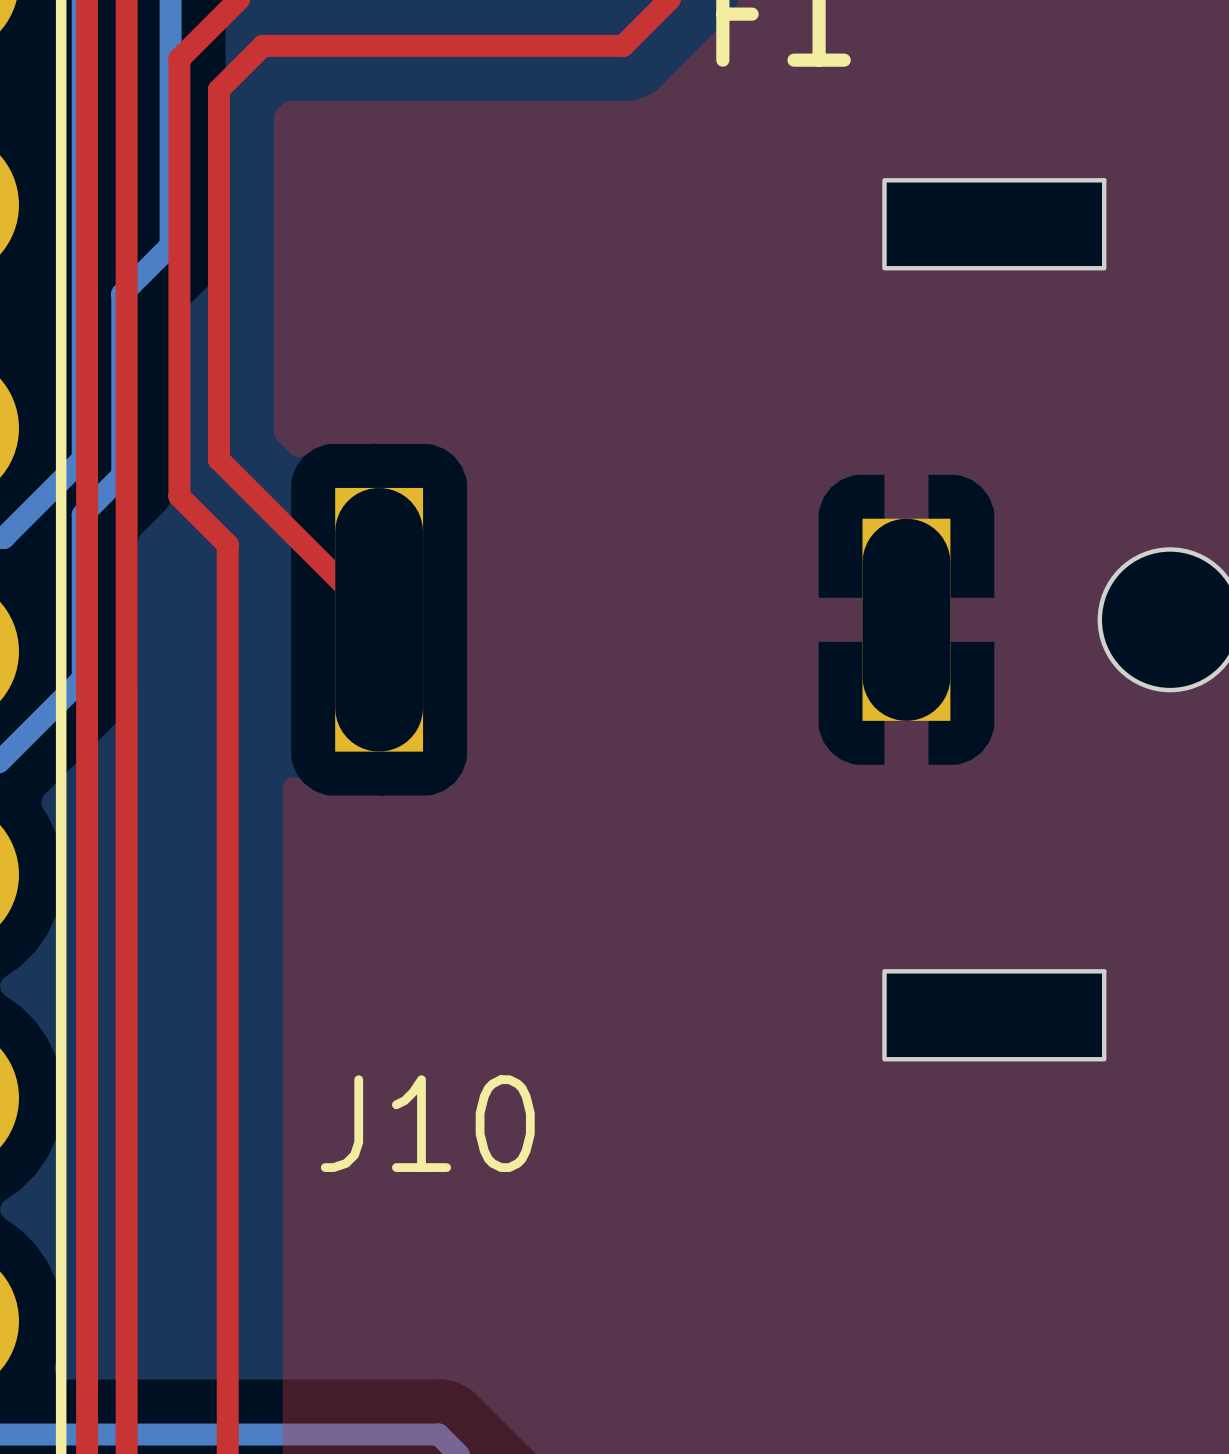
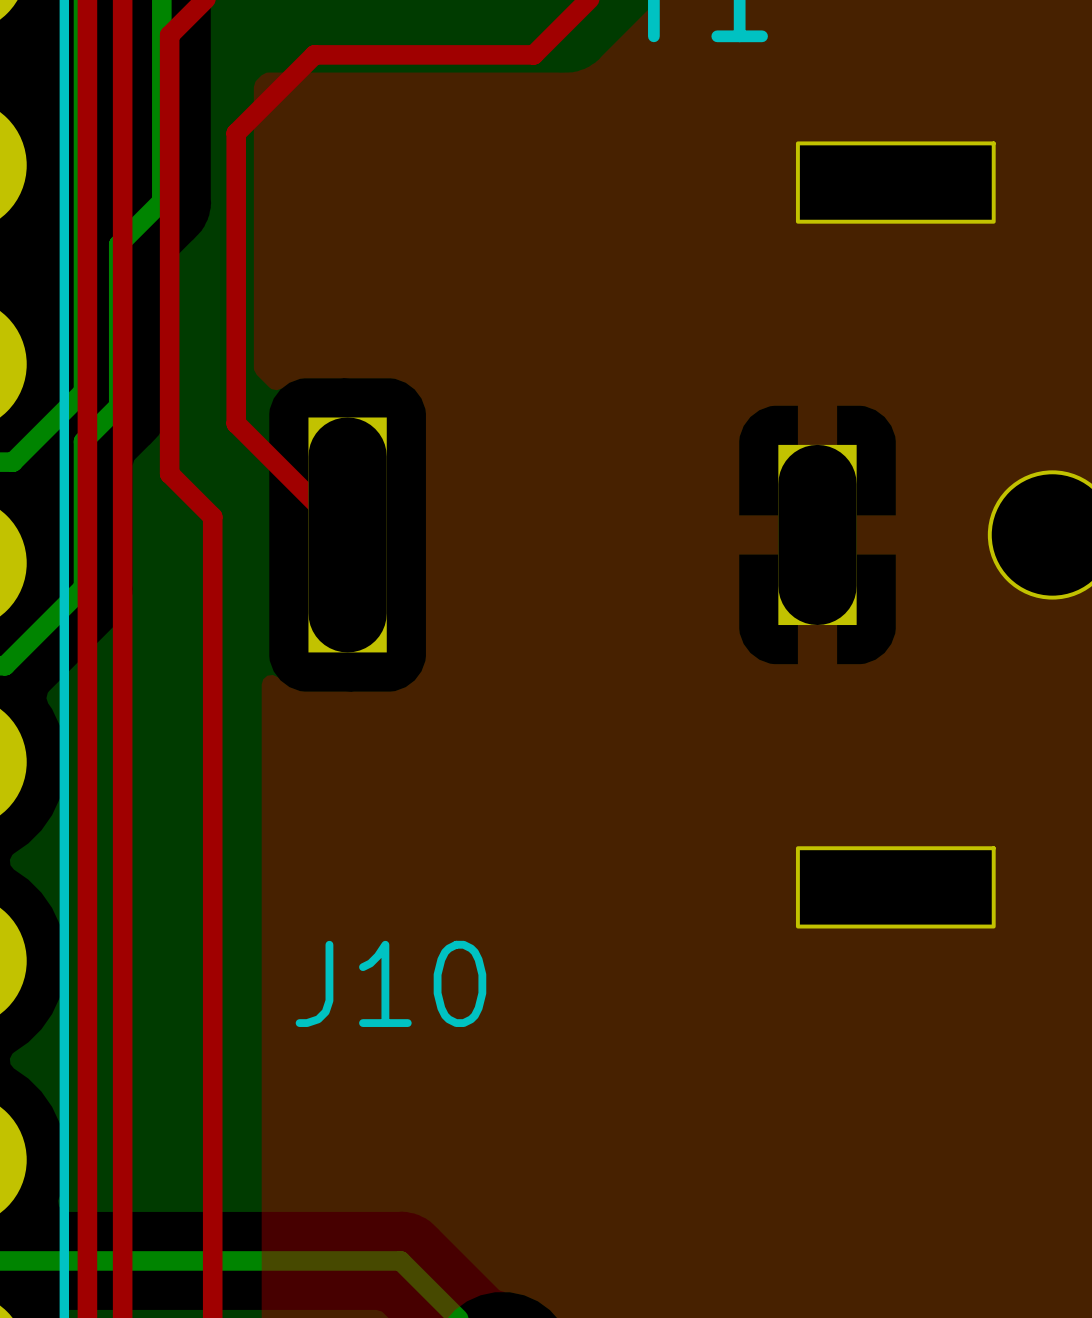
top track: (623, 45) (262, 45) (218, 89) (218, 459) (254, 494) -> (565, 23) (533, 54) (314, 54) (236, 133) (236, 423)
top track: (179, 496) (227, 544) (227, 599) -> (169, 424) (169, 473) (212, 516)

